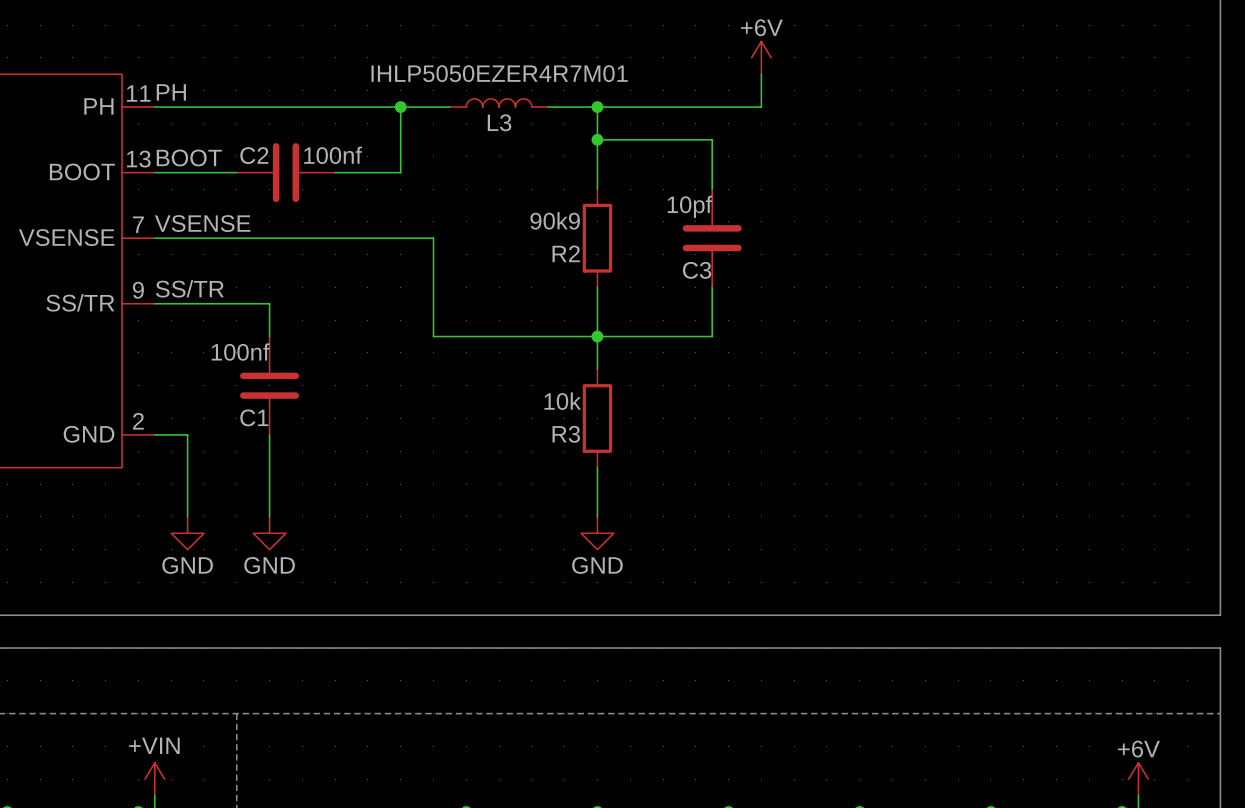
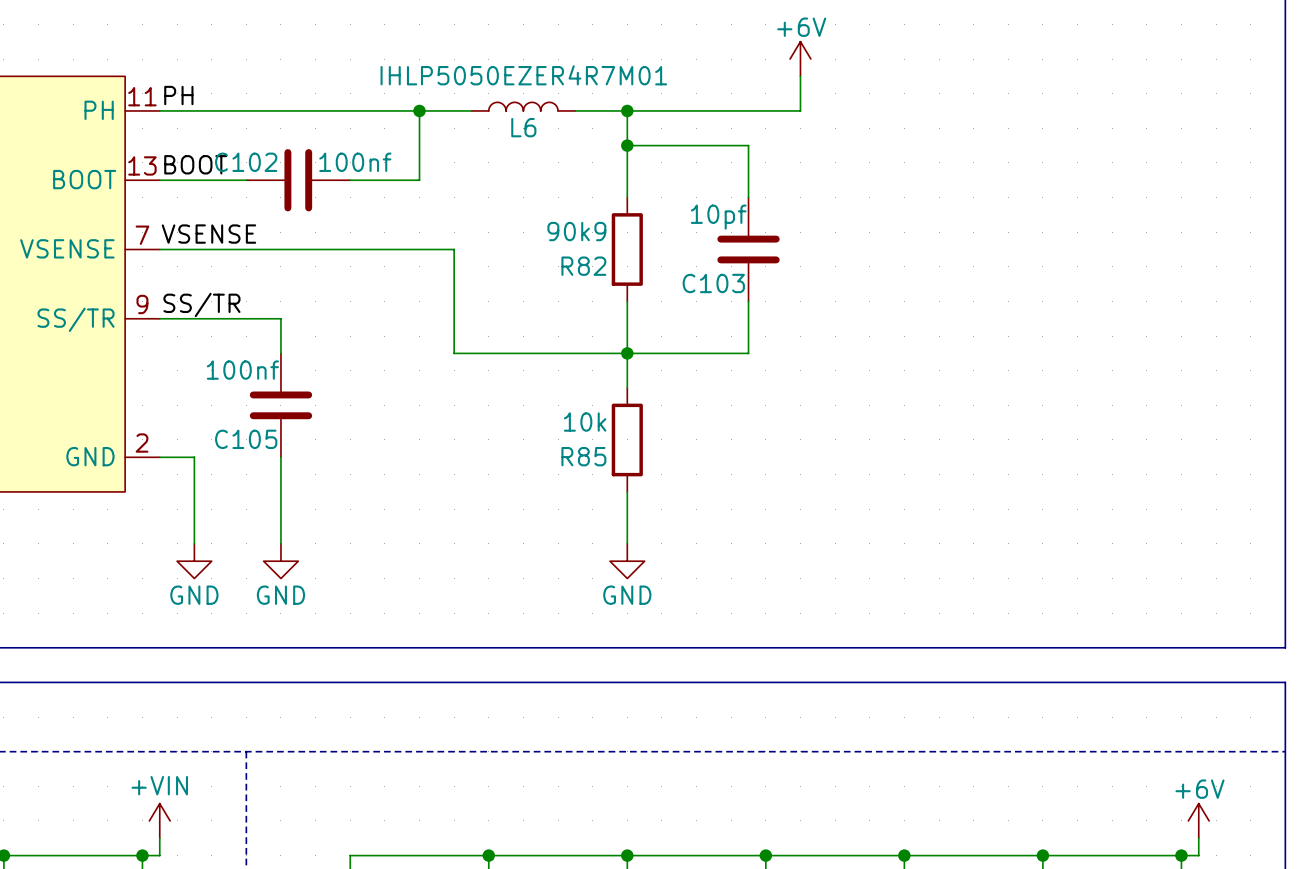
L3 name: L3 (499, 122) -> L6 (523, 127)
C2 name: C2 (254, 155) -> C102 (246, 162)
R2 name: R2 (566, 253) -> R82 (583, 266)
C3 name: C3 (697, 270) -> C103 (713, 283)
C1 name: C1 (254, 417) -> C105 (246, 439)
R3 name: R3 (566, 434) -> R85 (583, 456)

